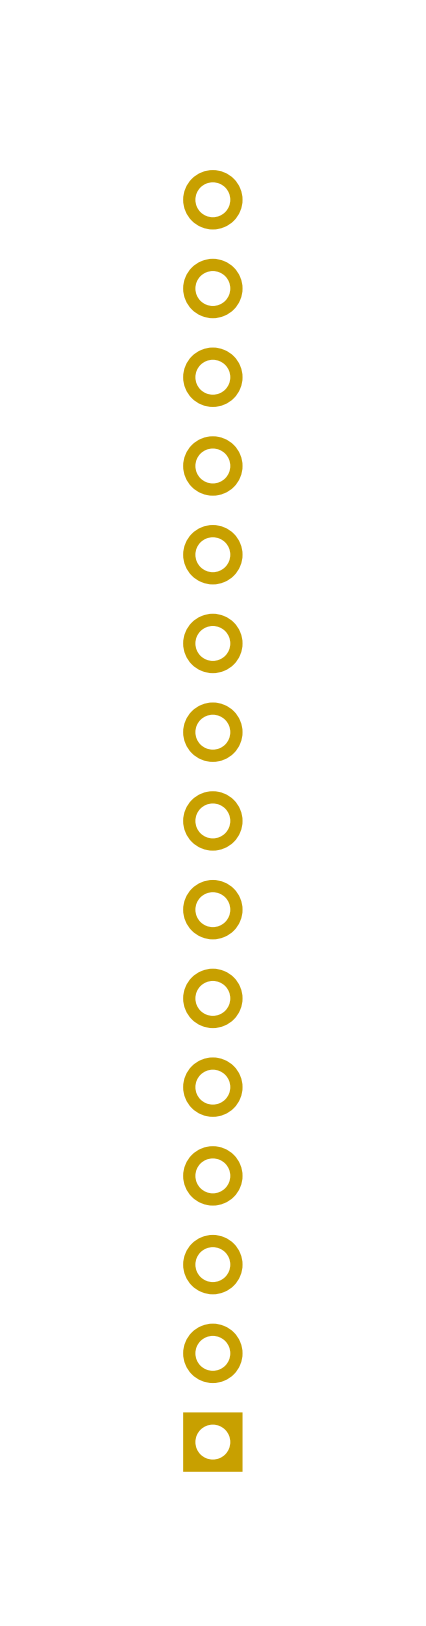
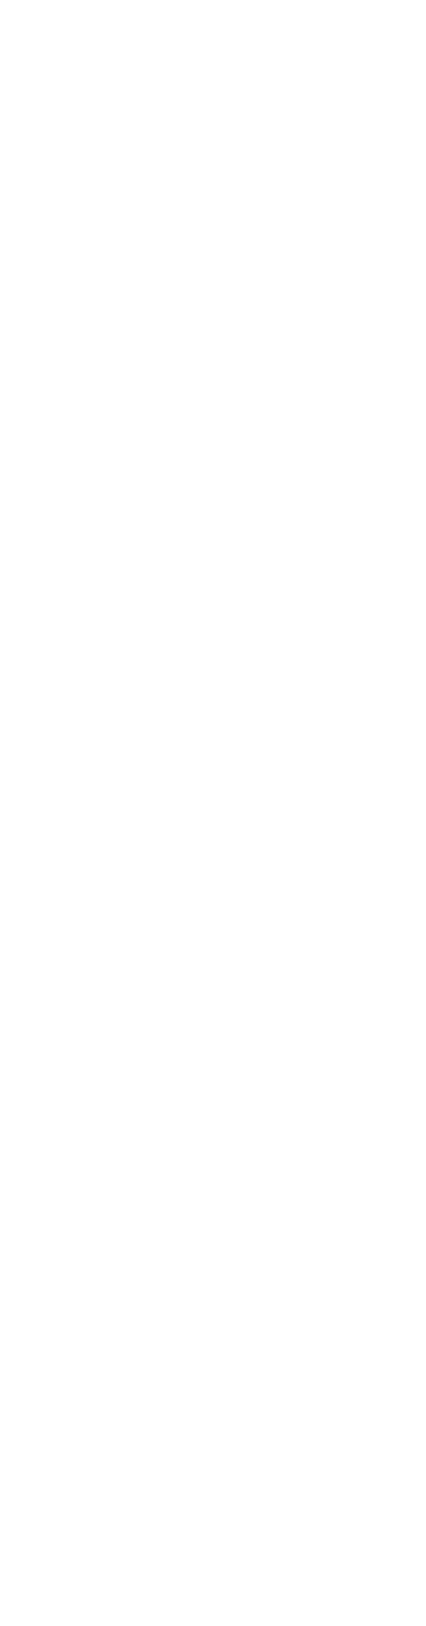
part: (212, 820) -> none

